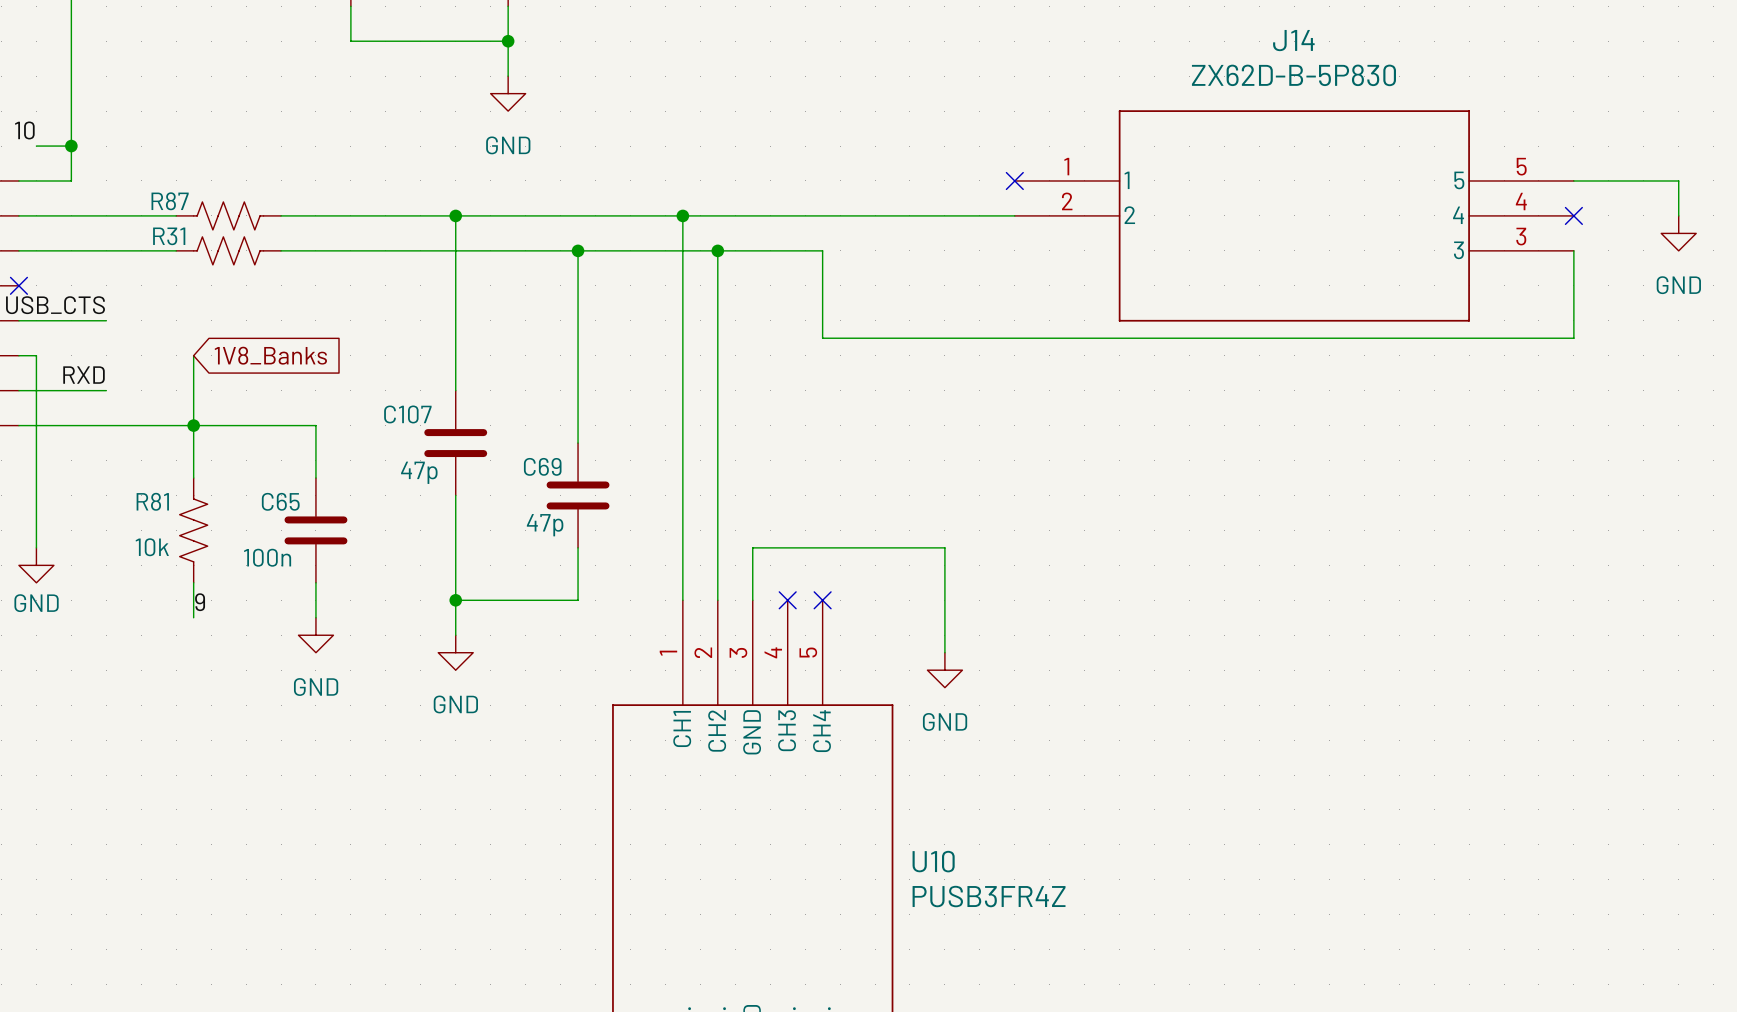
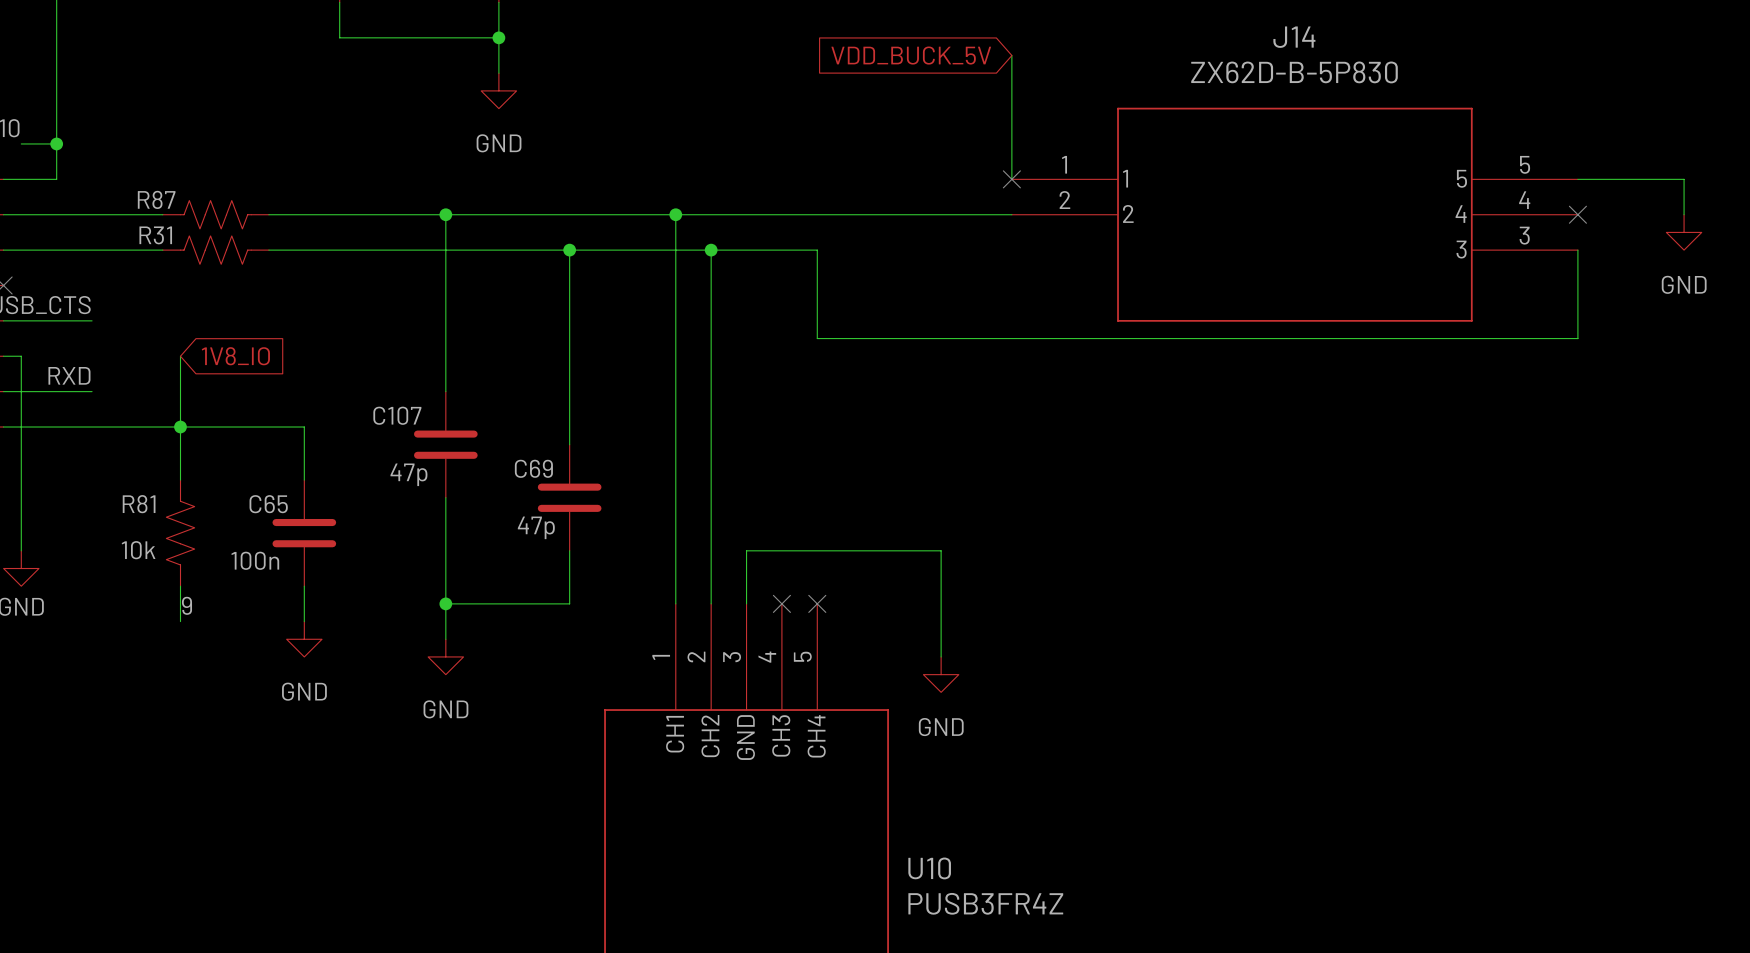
global label: none -> VDD_BUCK_5V (911, 55)
wire: none -> (1011, 55) (1011, 179)
global label: 1V8_Banks (270, 355) -> 1V8_IO (235, 356)

